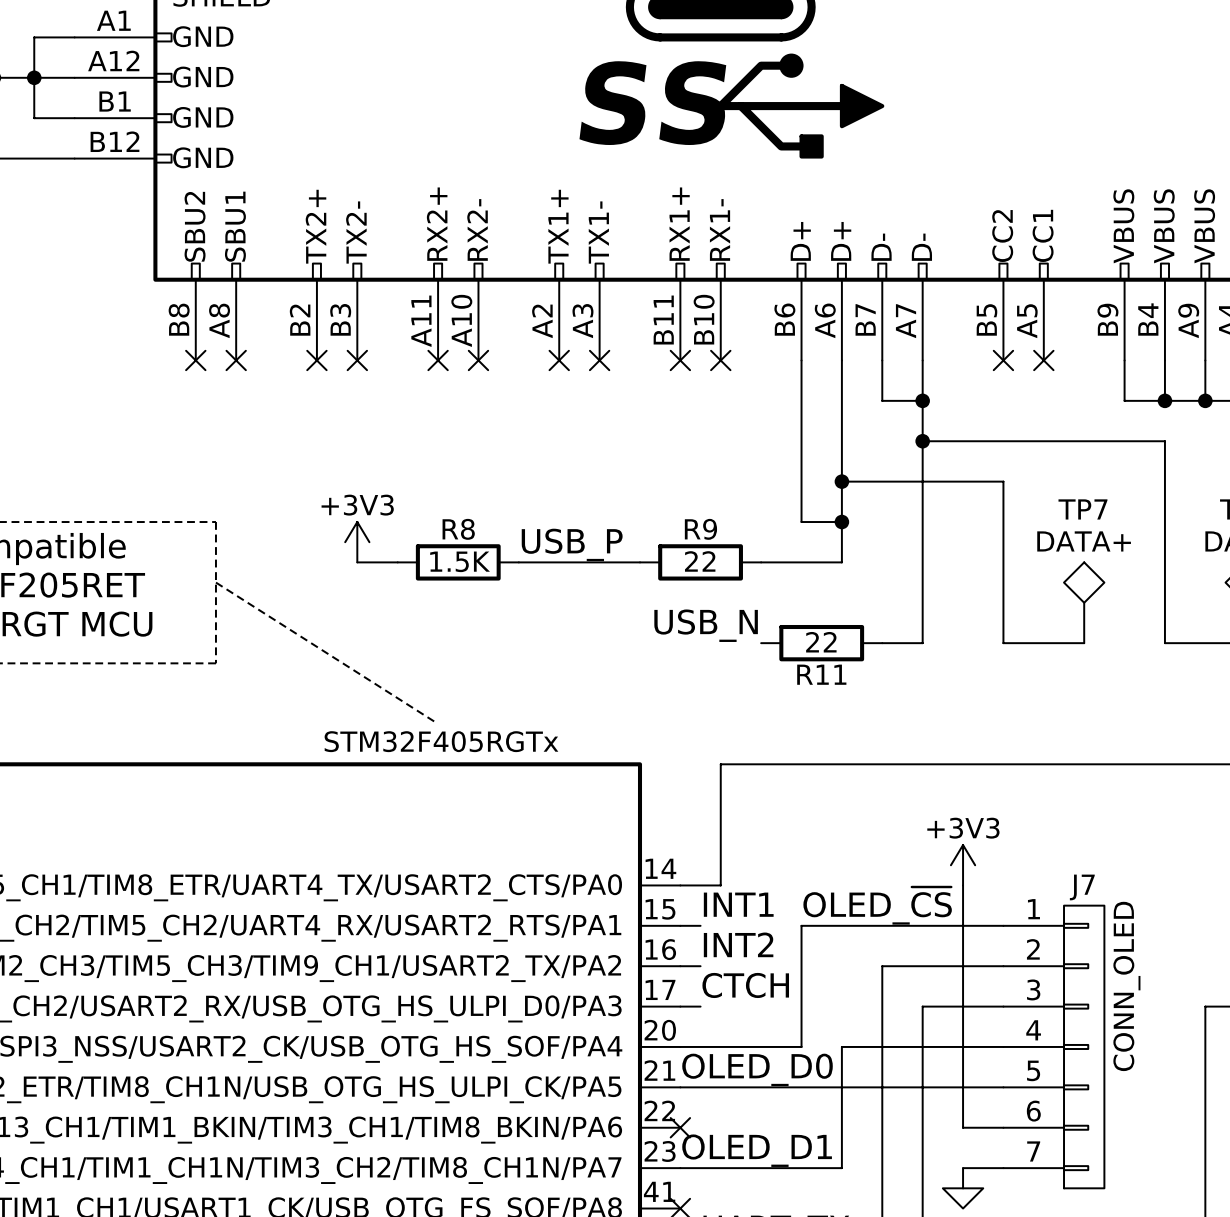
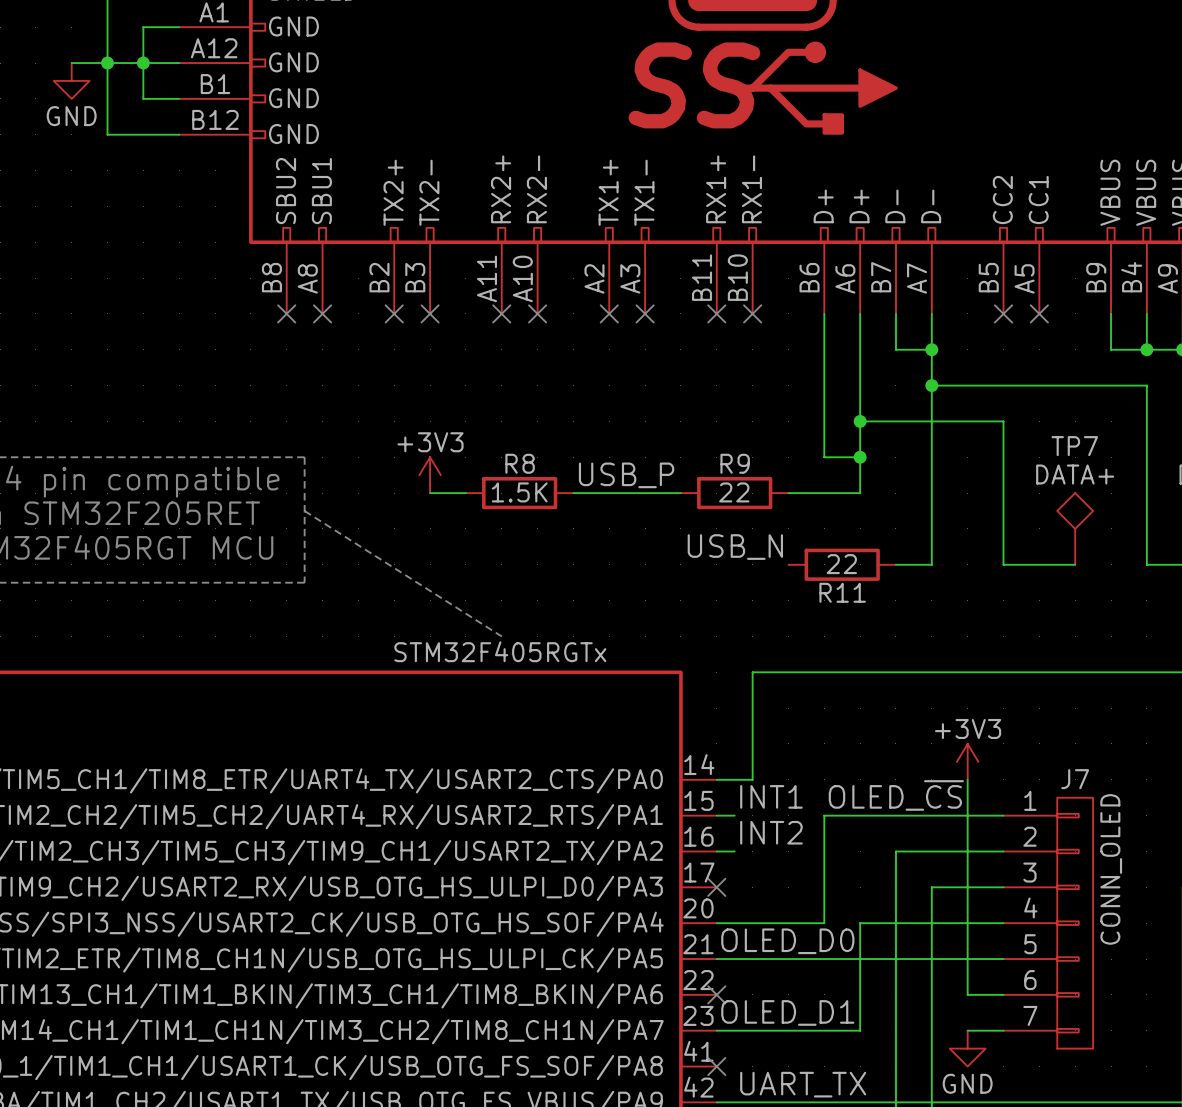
label: CTCH (745, 985) -> none
wire: (680, 1006) (700, 1006) -> none
no-connect mark: none -> (716, 887)

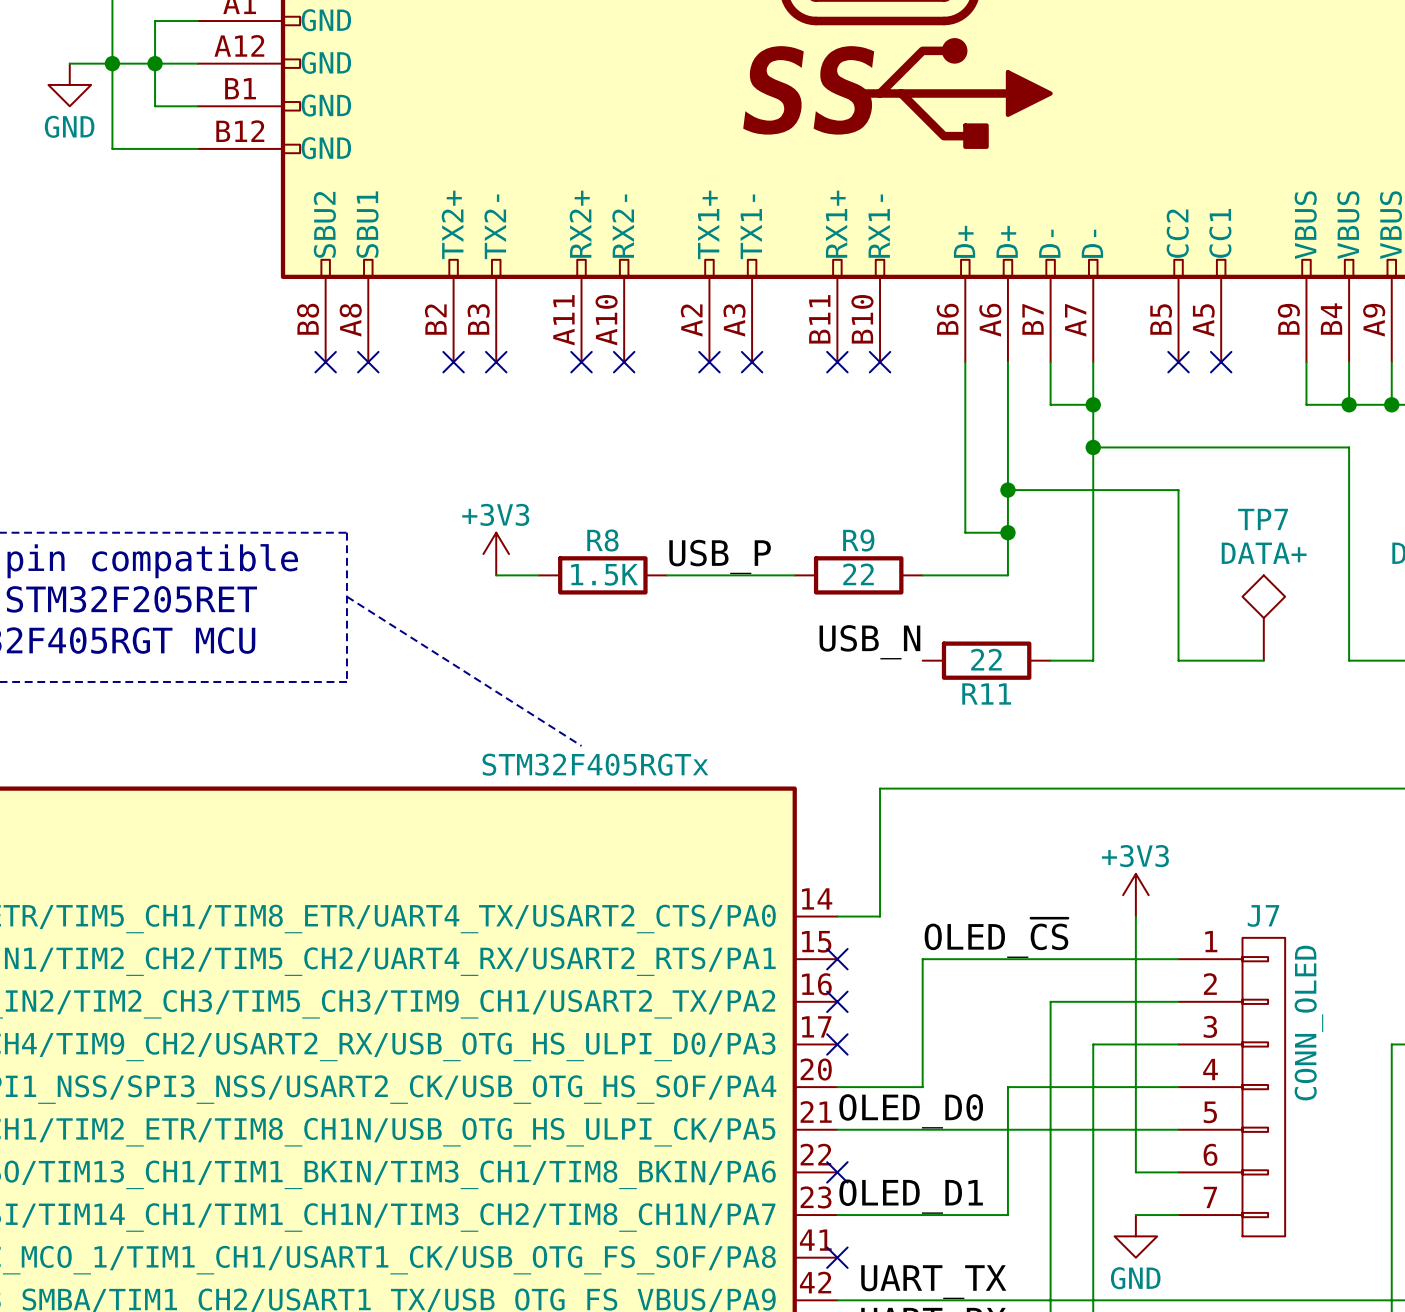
label position: OLED_~{CS} (896, 795) -> OLED_~{CS} (996, 938)
label: INT1 (771, 796) -> none
wire: (716, 815) (734, 815) -> none
no-connect mark: none -> (837, 959)
wire: (824, 815) (824, 923) (788, 923) -> (965, 959) (922, 959) (922, 1087)
label: INT2 (771, 832) -> none
wire: (716, 851) (734, 851) -> none
no-connect mark: none -> (837, 1001)

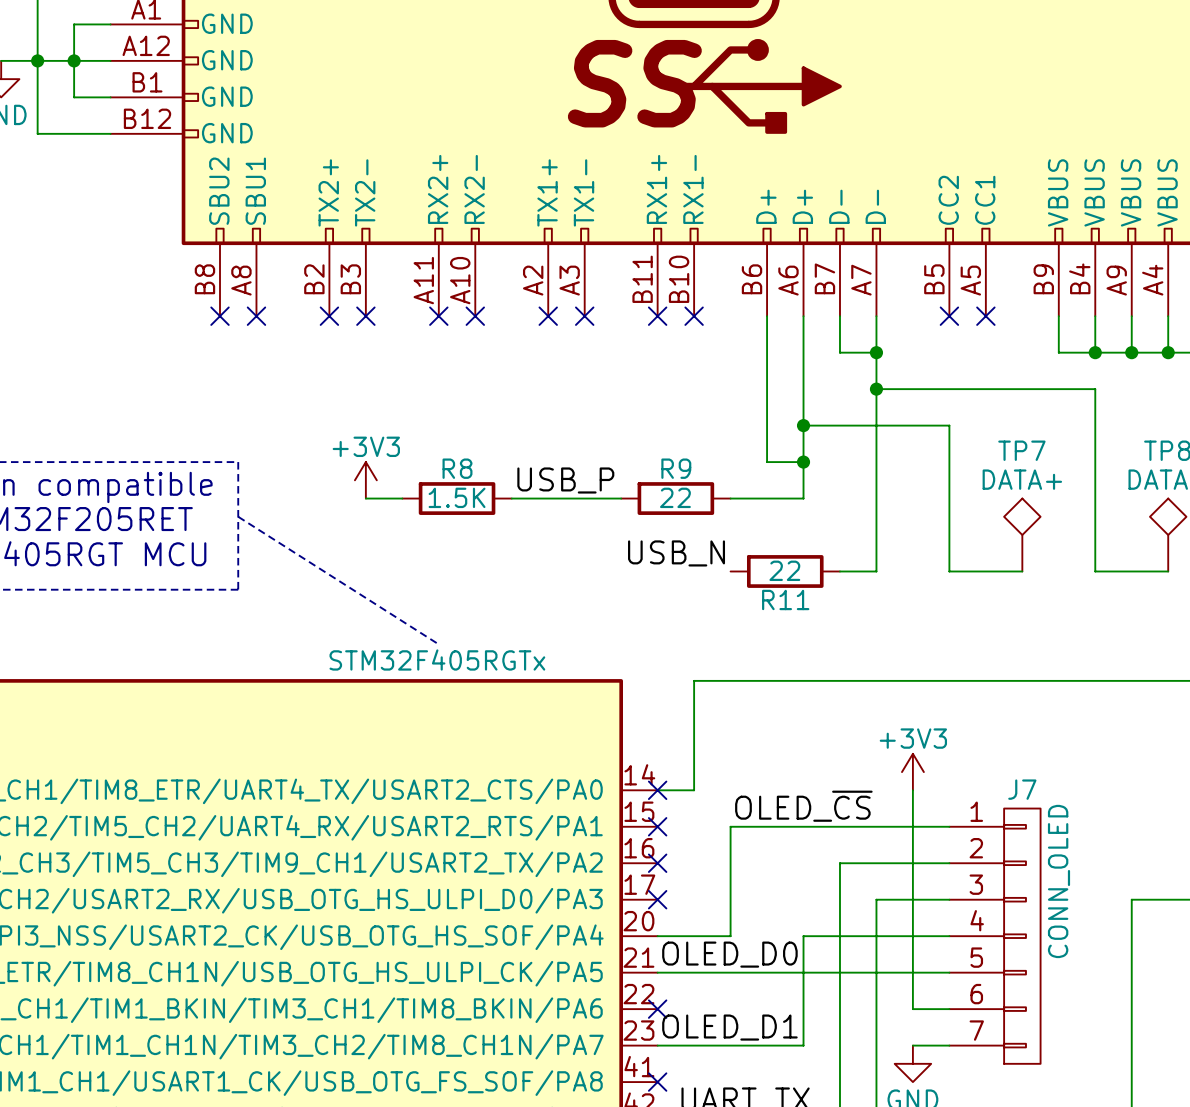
no-connect mark: none -> (657, 790)

